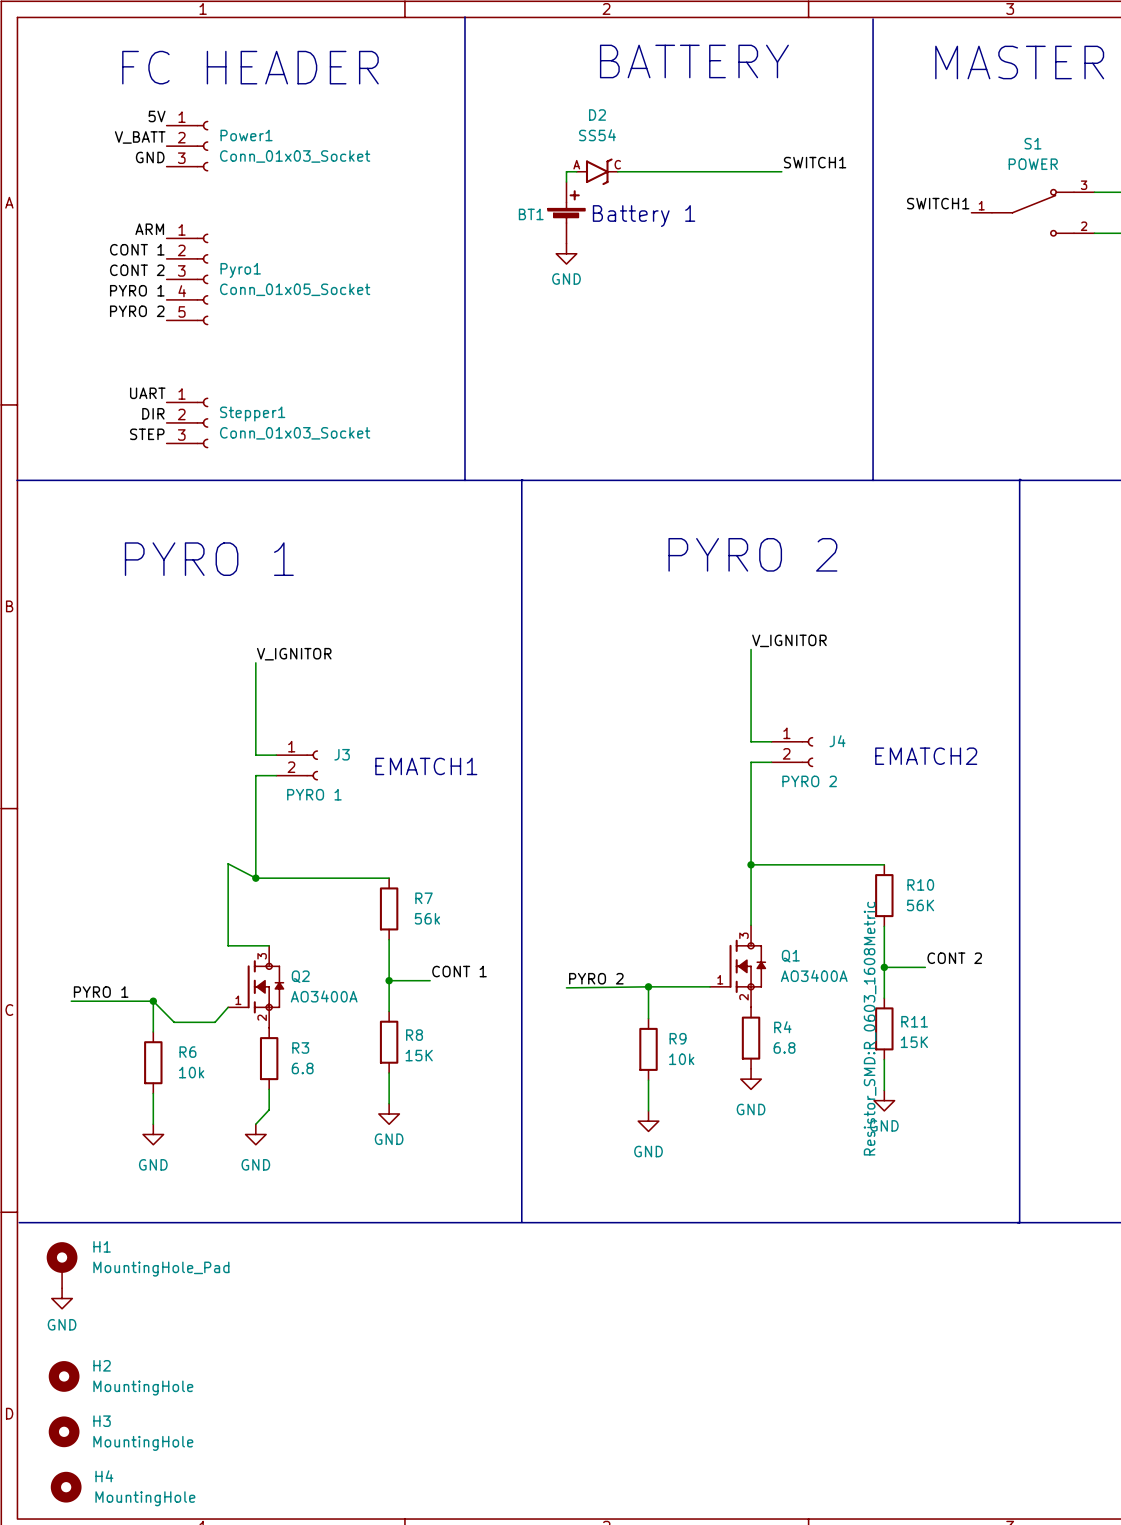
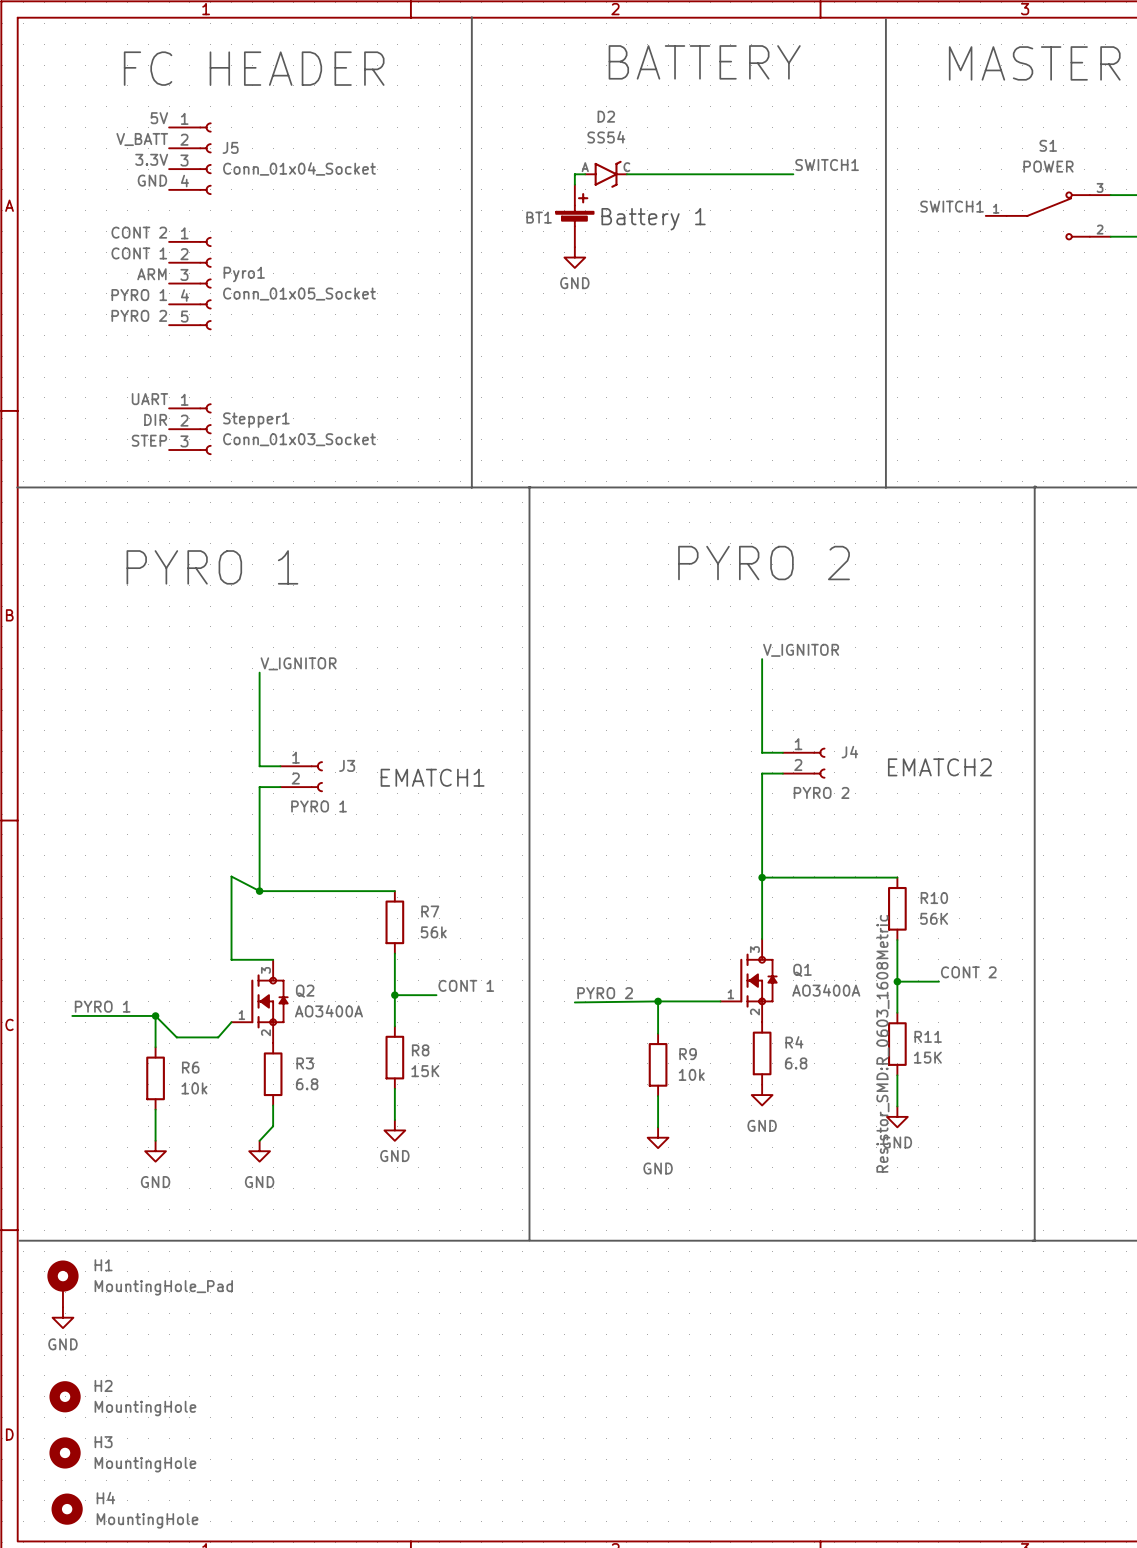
Power1: Conn_01x03_Socket (187, 146) -> none
J5: none -> Conn_01x04_Socket (190, 158)
label: GND (150, 157) -> 3.3V (151, 159)
label: none -> GND (152, 180)
label: ARM (149, 229) -> CONT 2 (139, 232)
label: CONT 2 (137, 270) -> ARM (151, 274)

